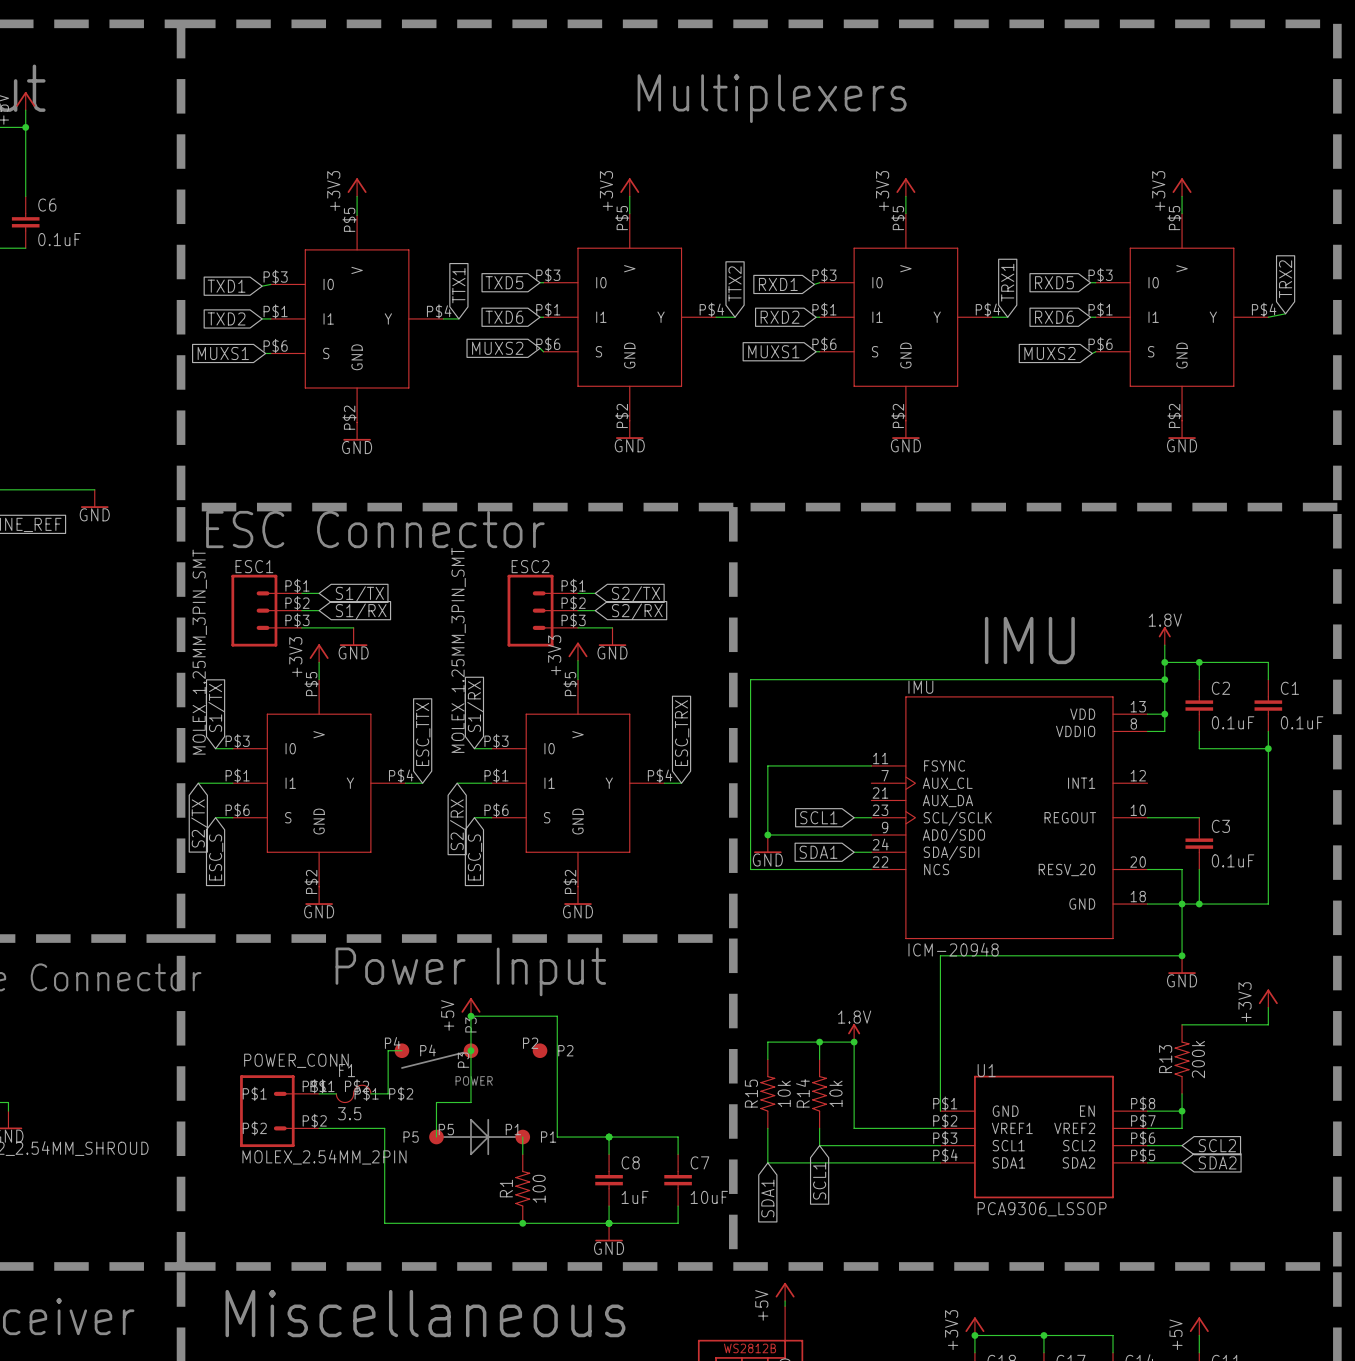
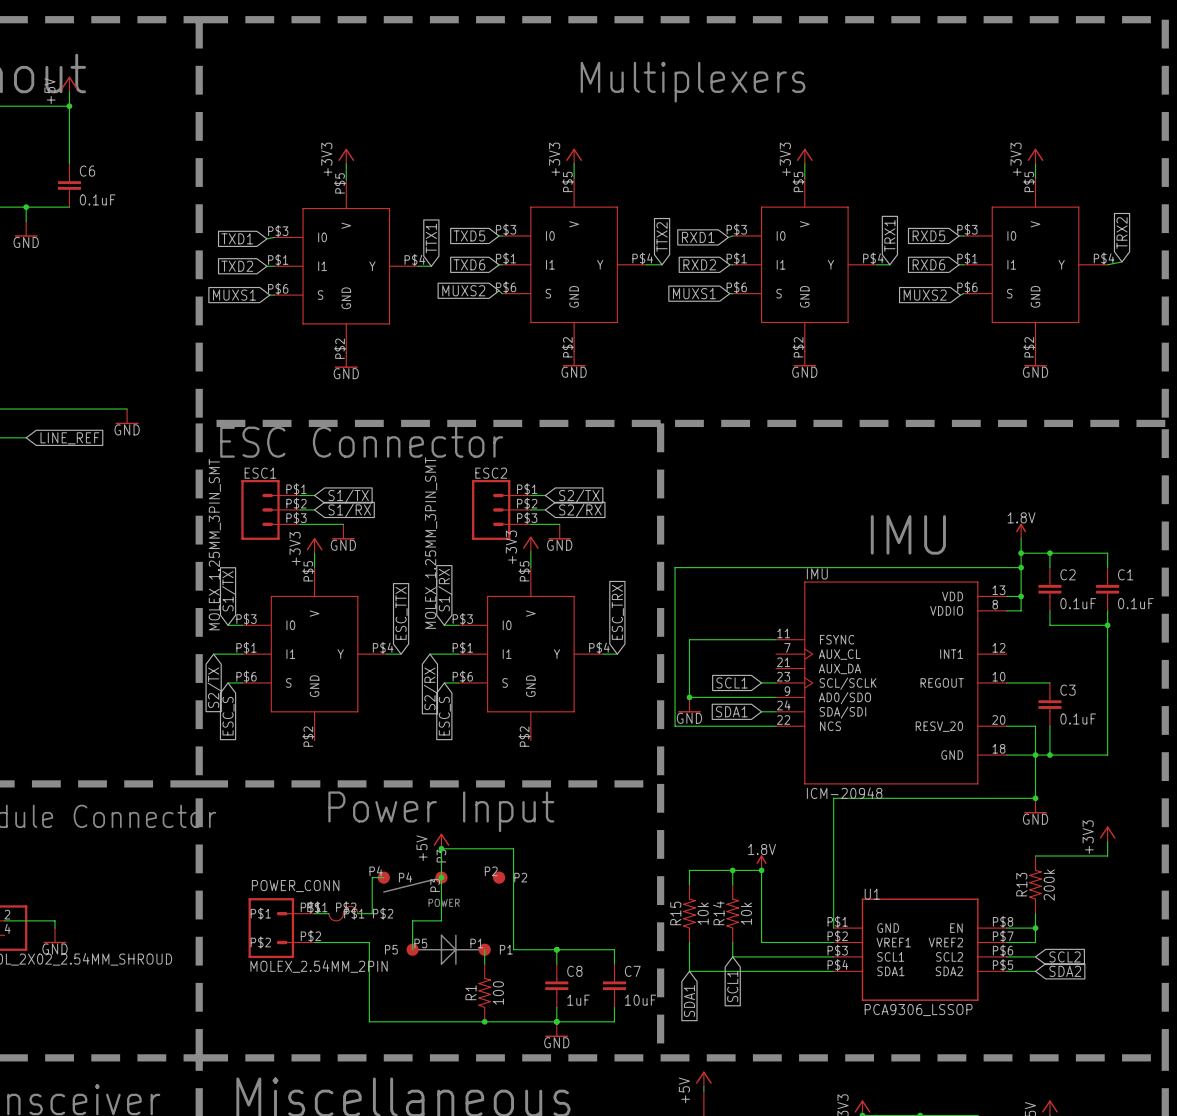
power symbol: GND (319, 895) -> none
power symbol: GND (577, 895) -> none
F1 name: F1 (347, 1070) -> none
F1 value: 3.5 (349, 1113) -> none

